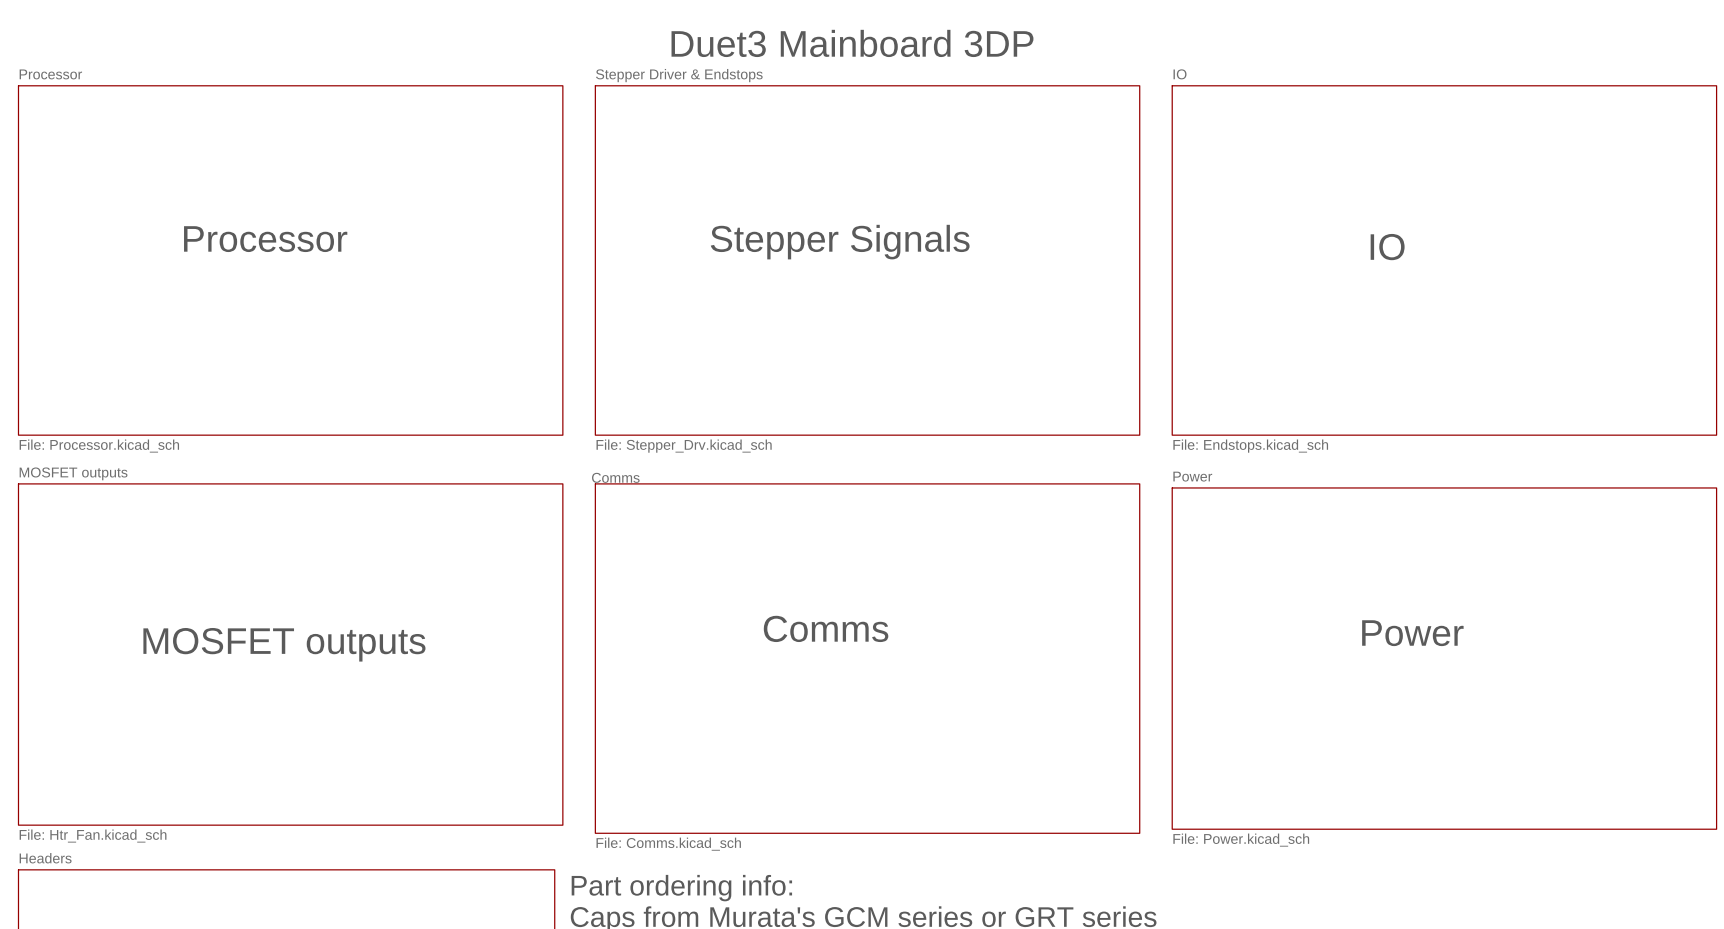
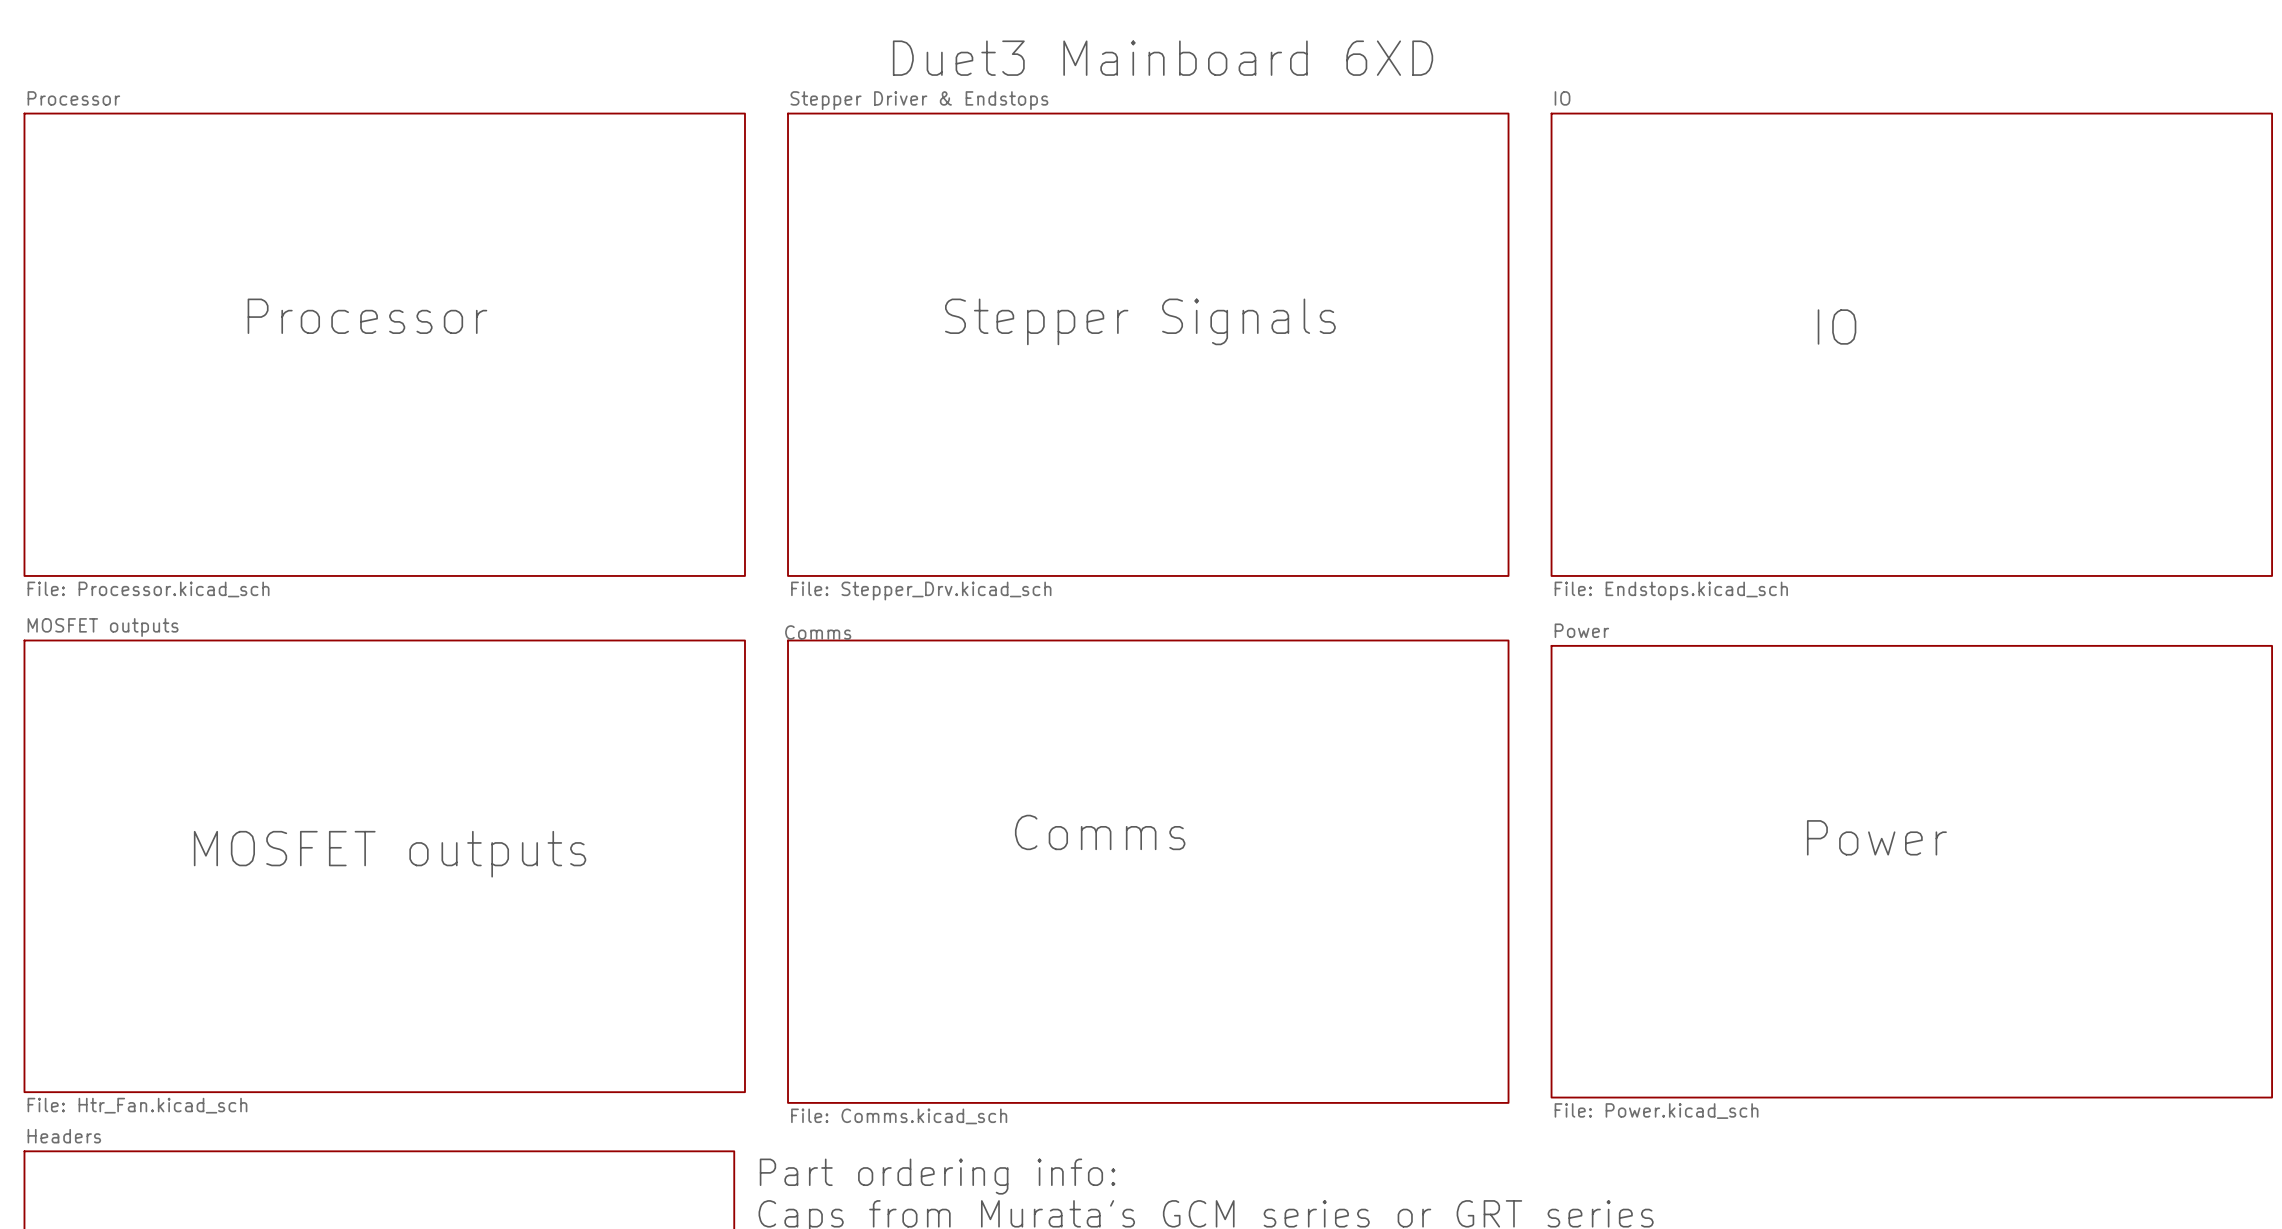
text: Duet3 Mainboard 3DP (852, 43) -> Duet3 Mainboard 6XD (1163, 58)

